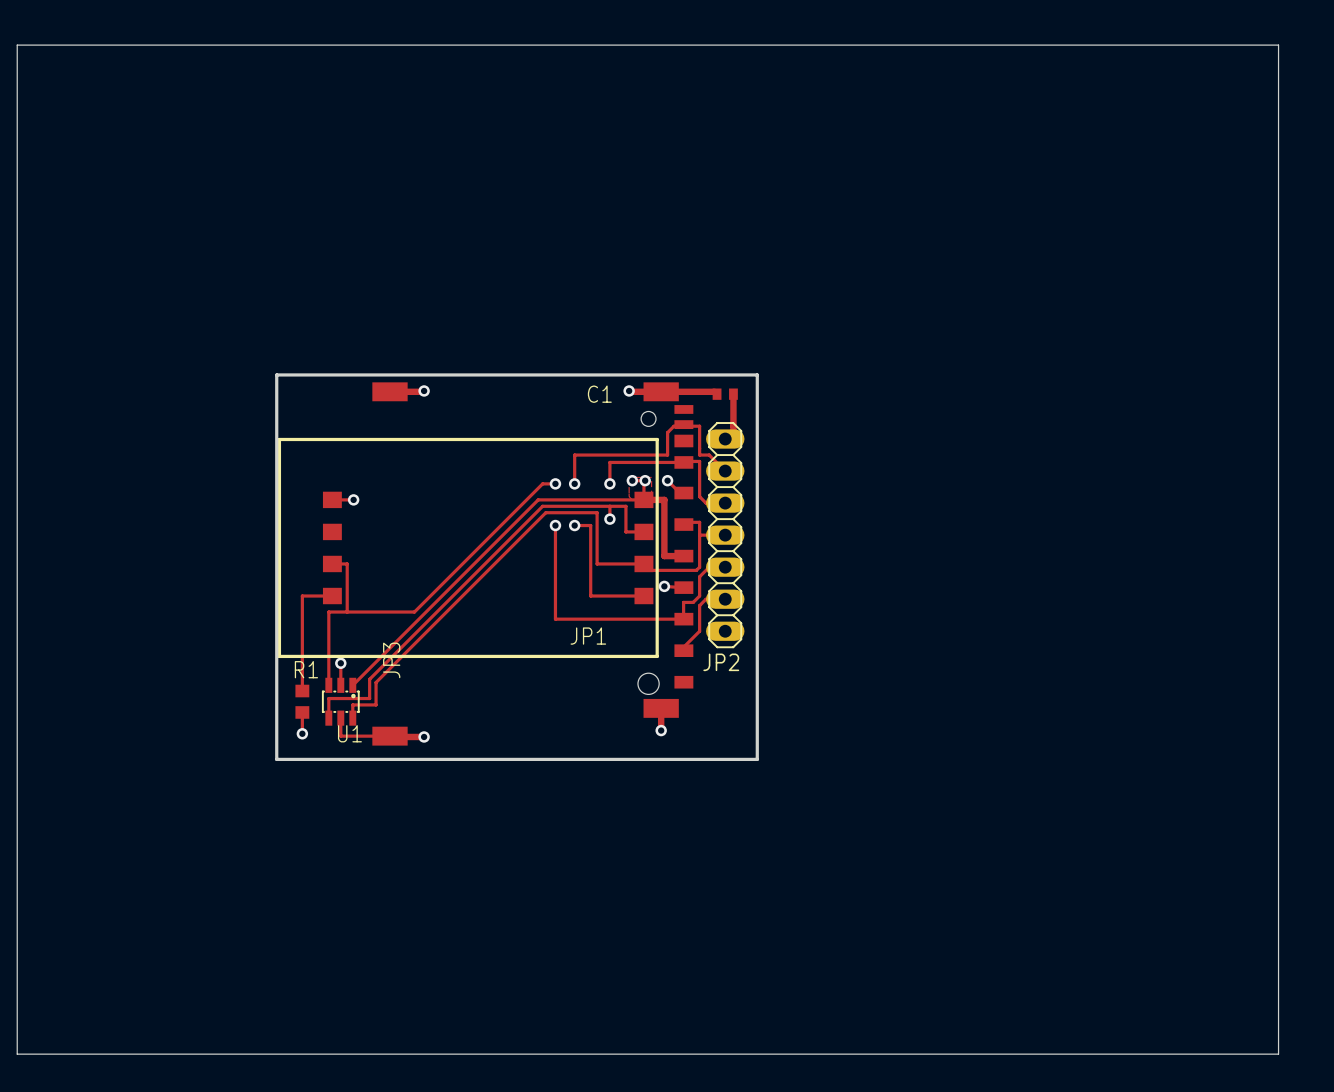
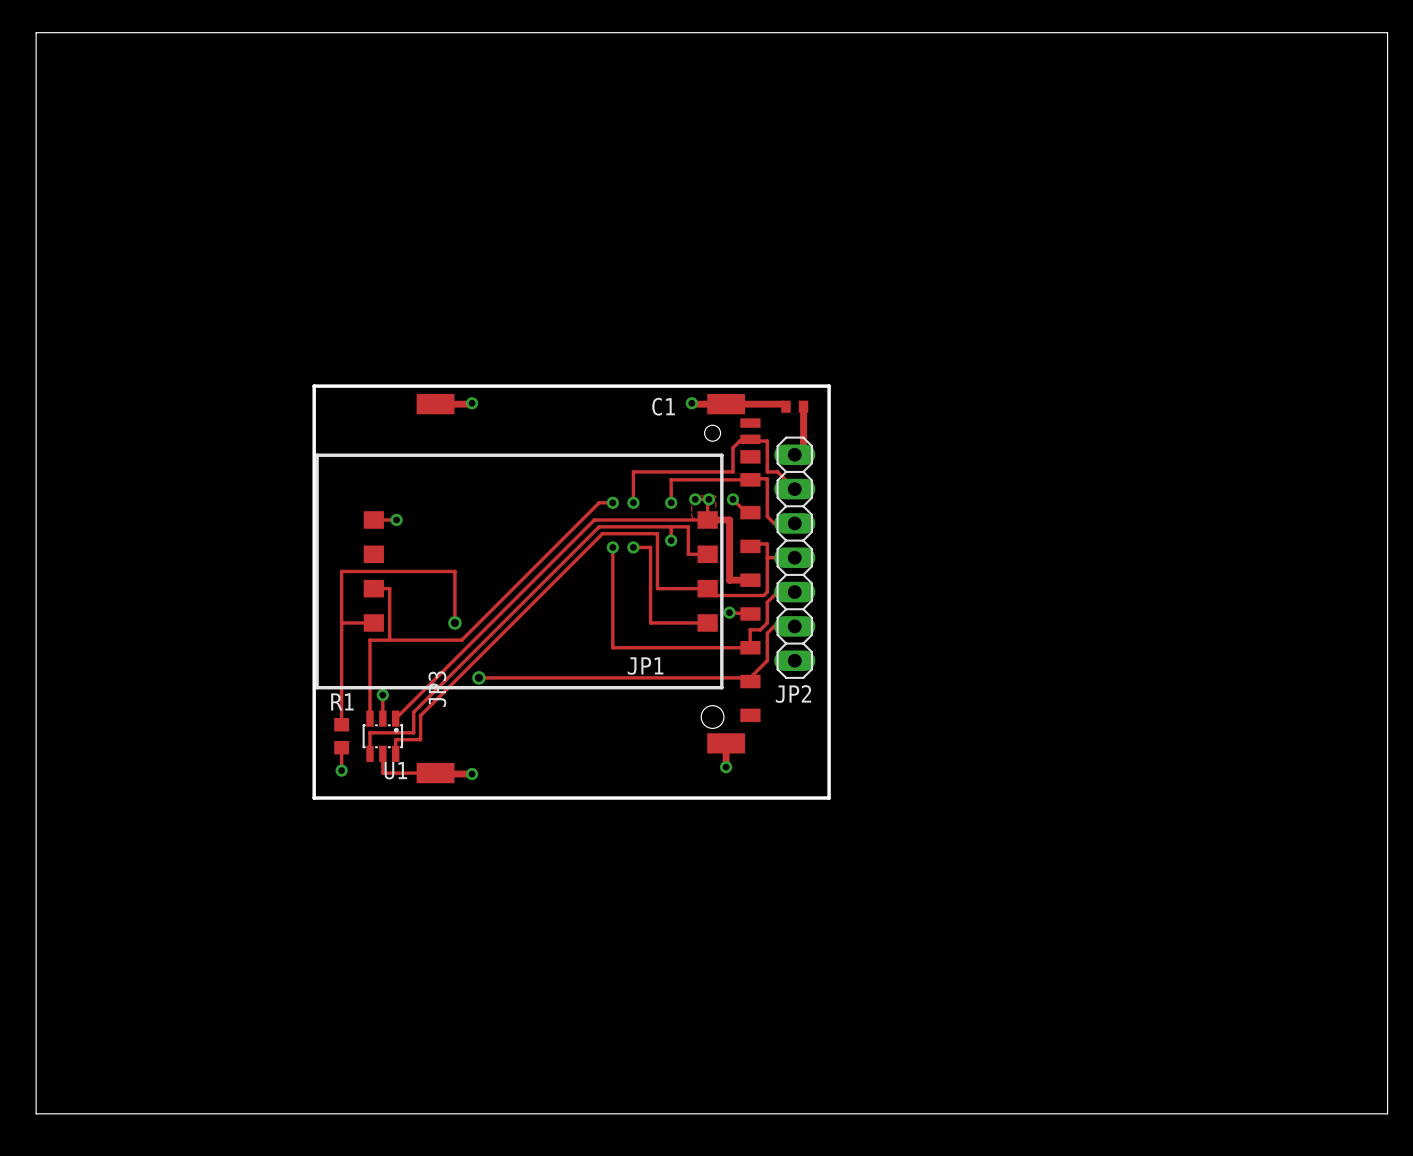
track: none -> (341, 622) (341, 571) (454, 571) (454, 622)
via: none -> (454, 622)
track: none -> (478, 677) (750, 677)
via: none -> (478, 677)

